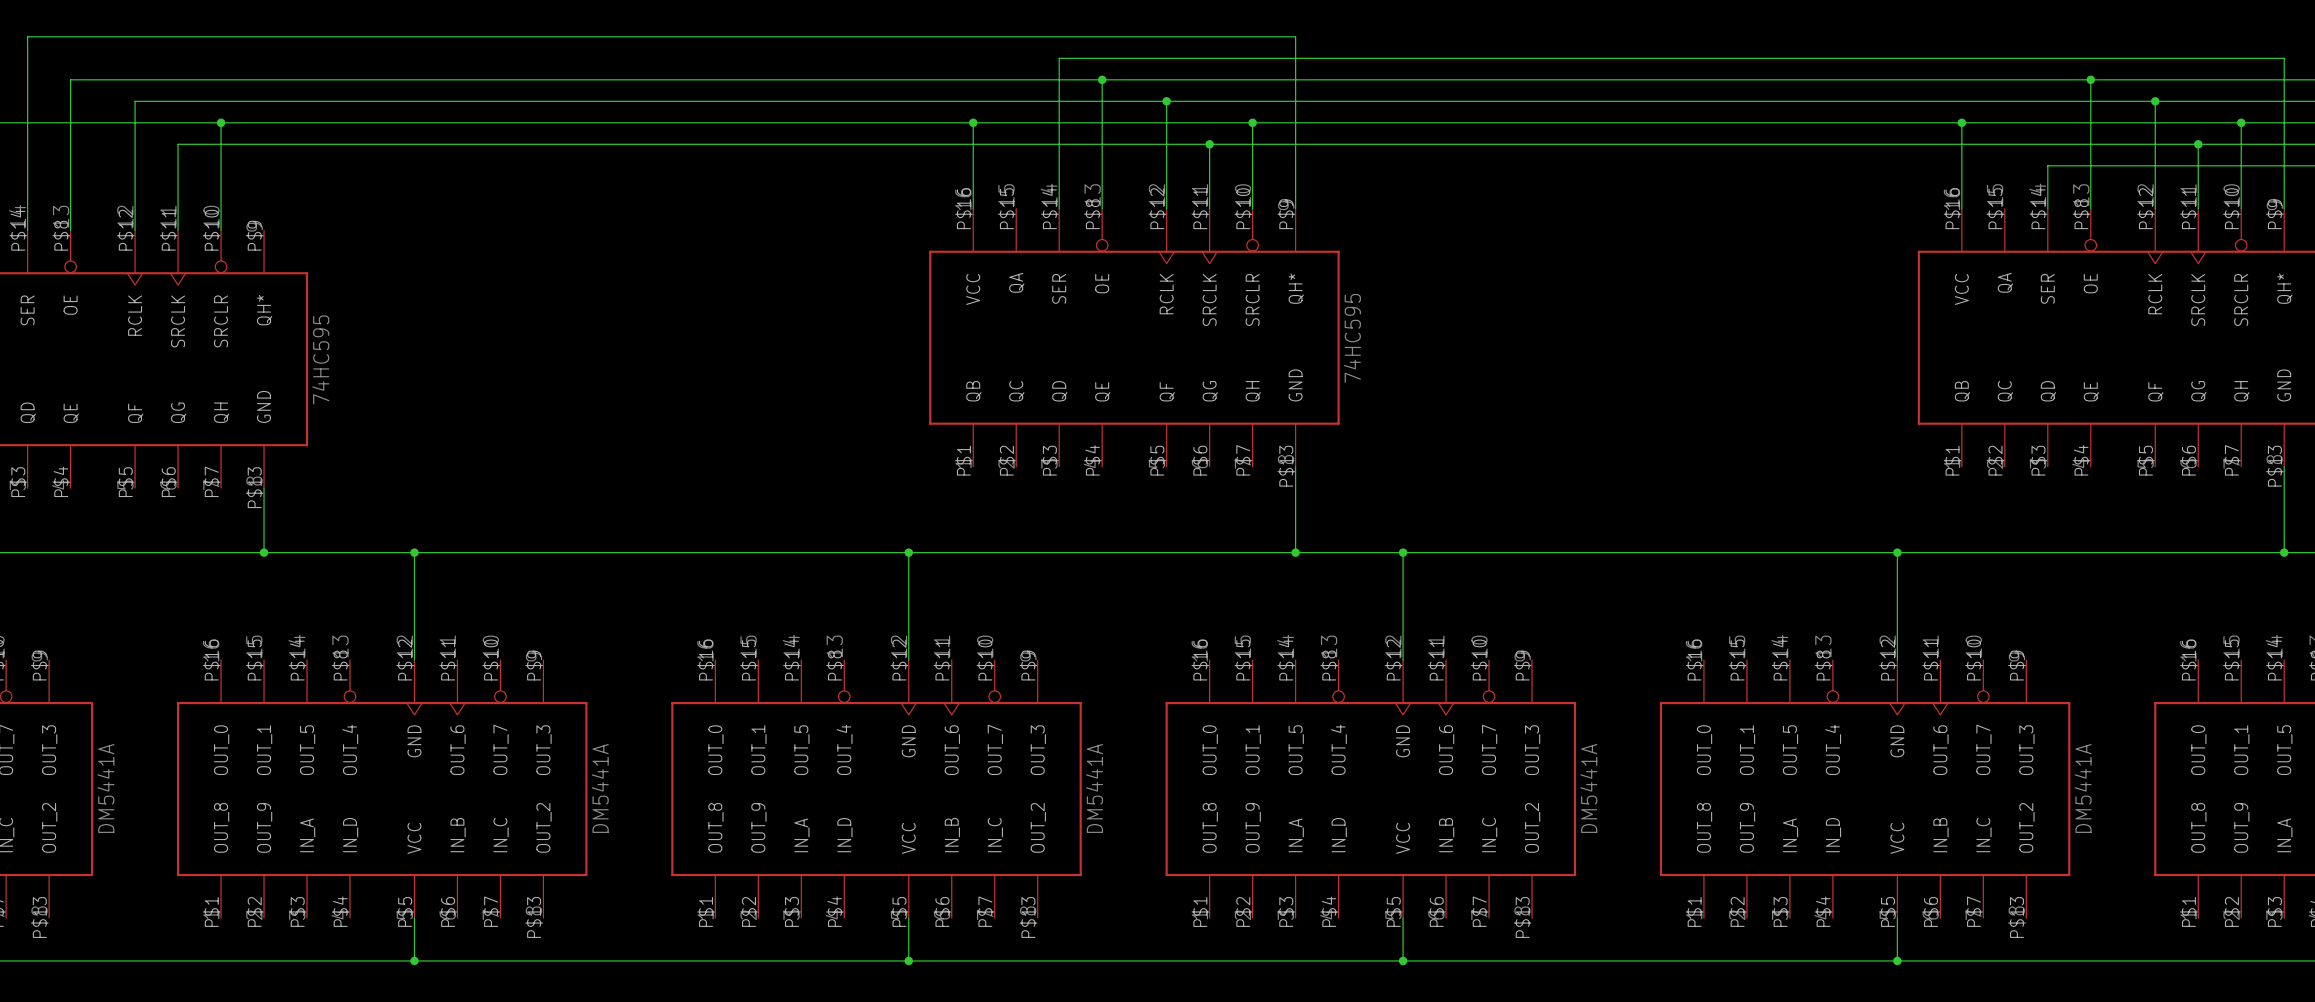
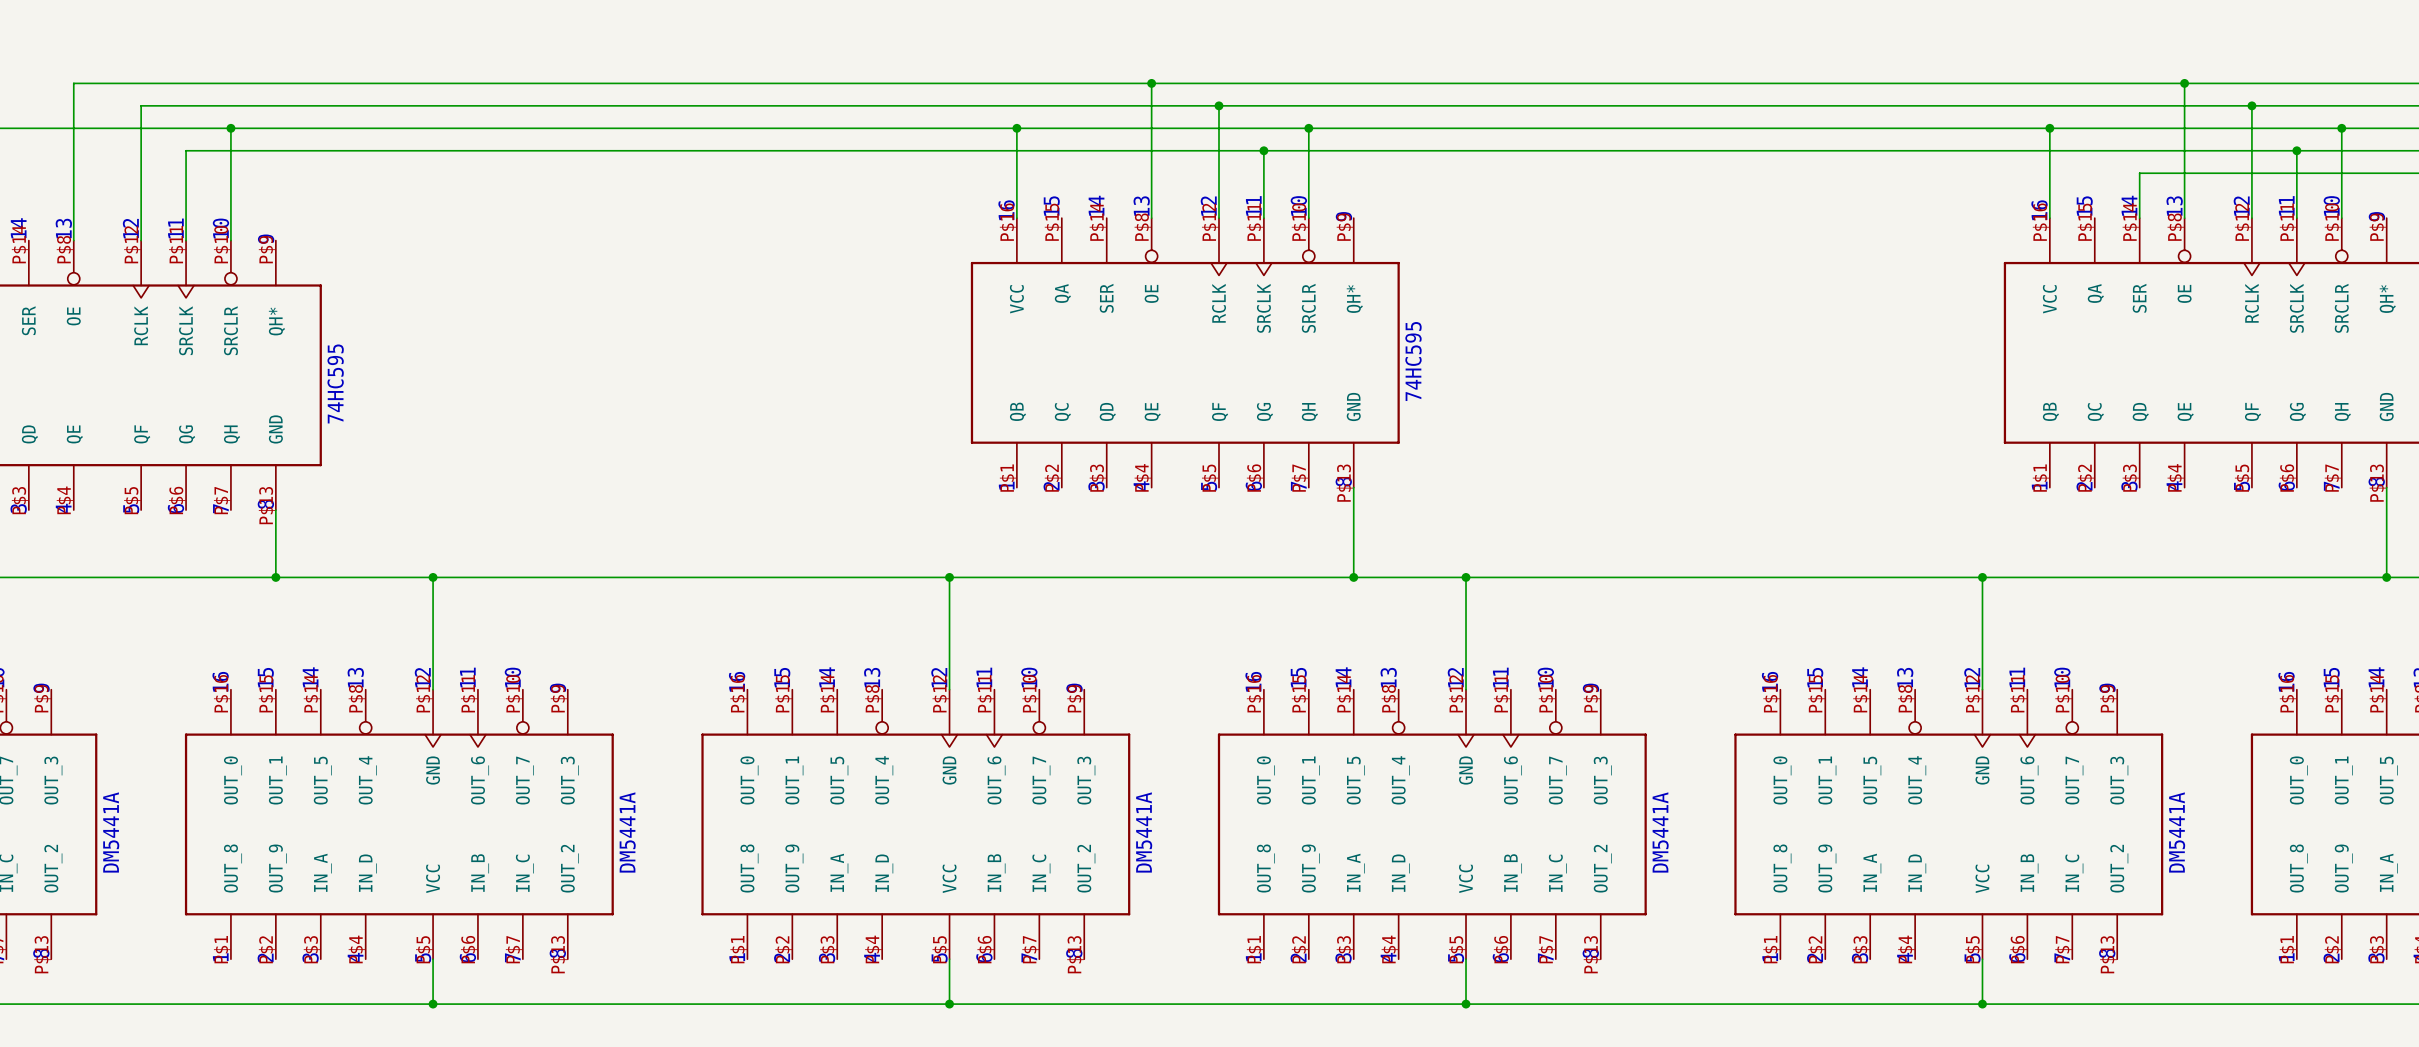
wire: (1059, 208) (1059, 58) (2284, 58) (2284, 208) -> none
wire: (1295, 208) (1295, 36) (27, 36) (27, 230) -> none

